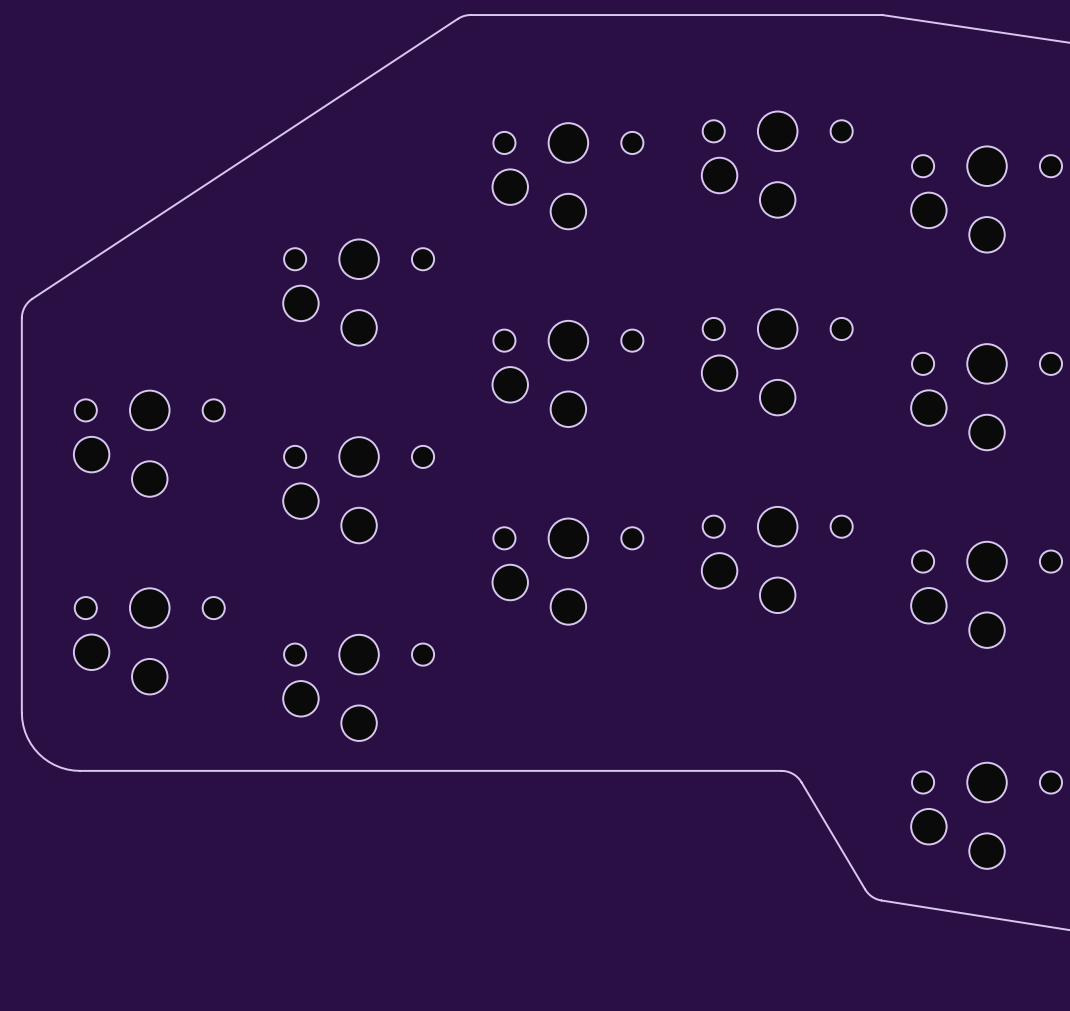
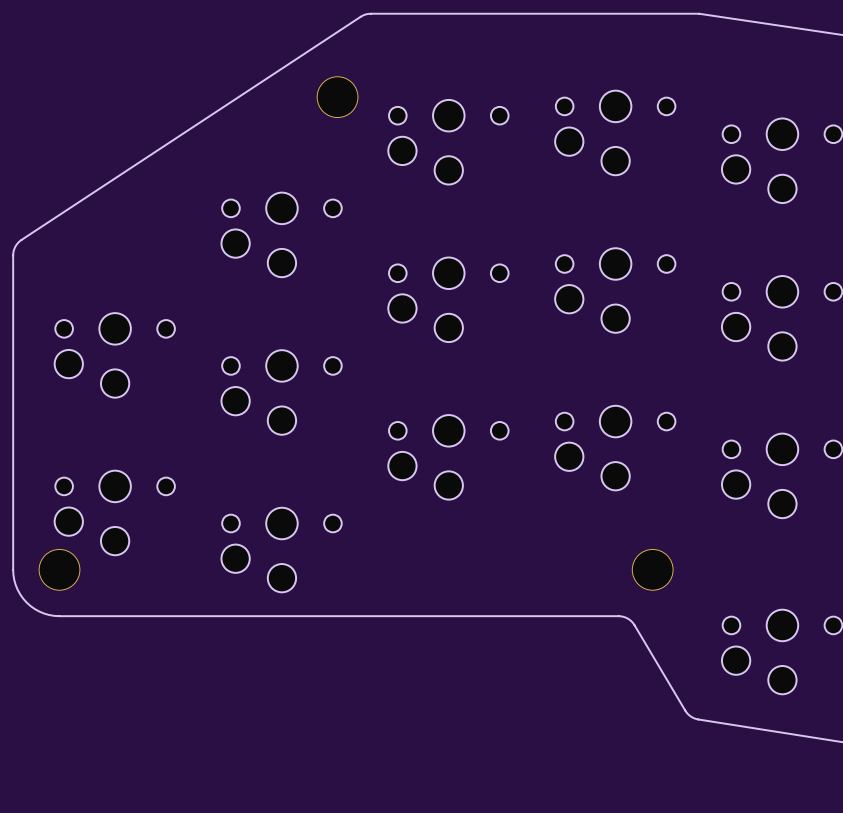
part: none -> (337, 97)
part: none -> (59, 569)
part: none -> (652, 569)

